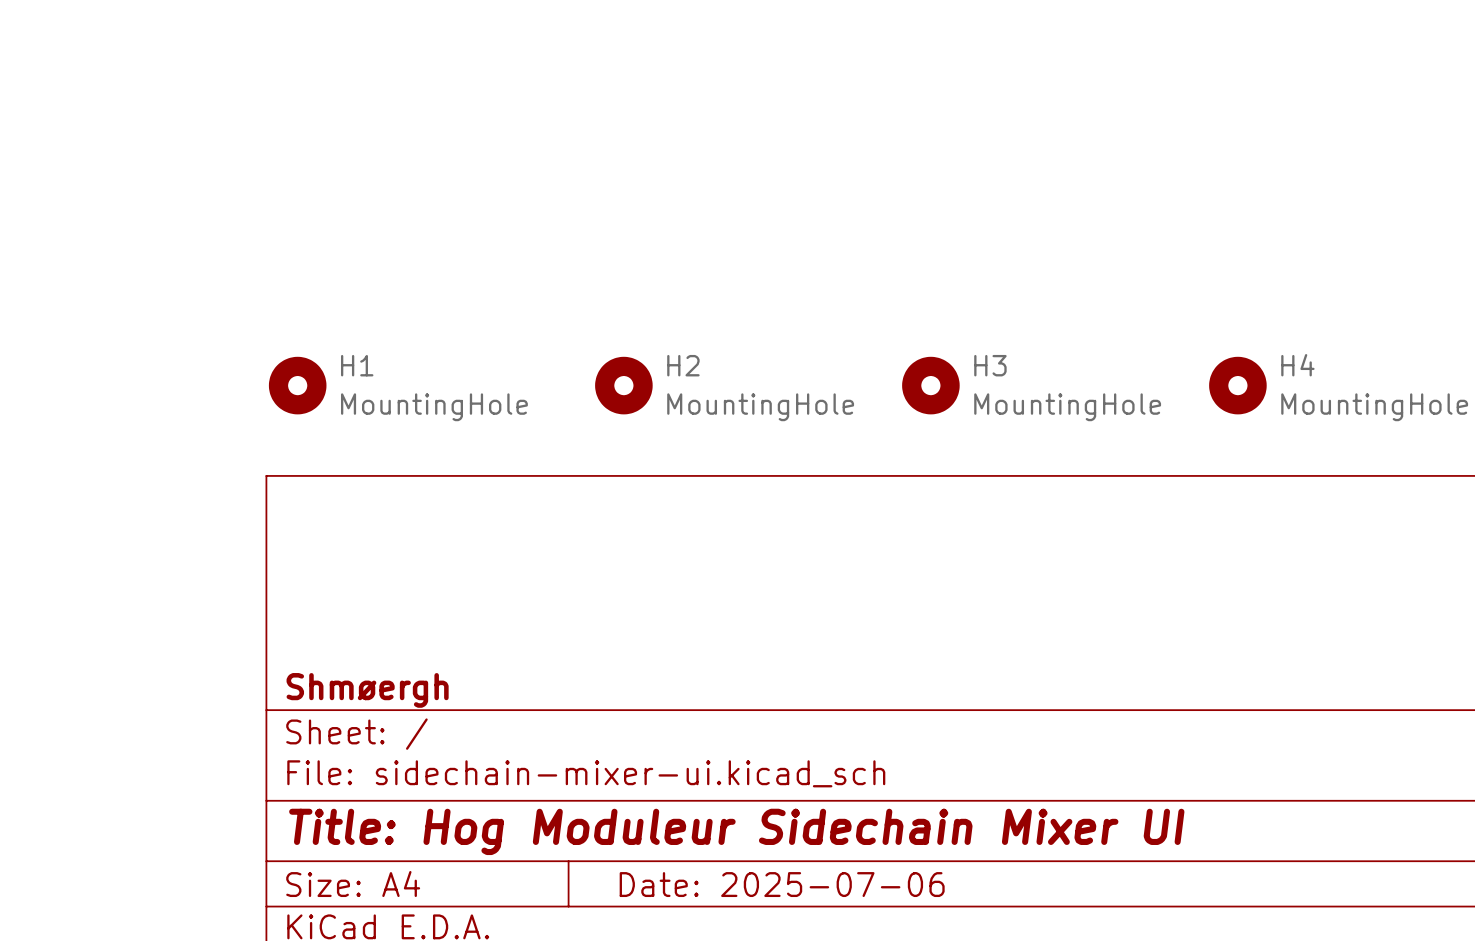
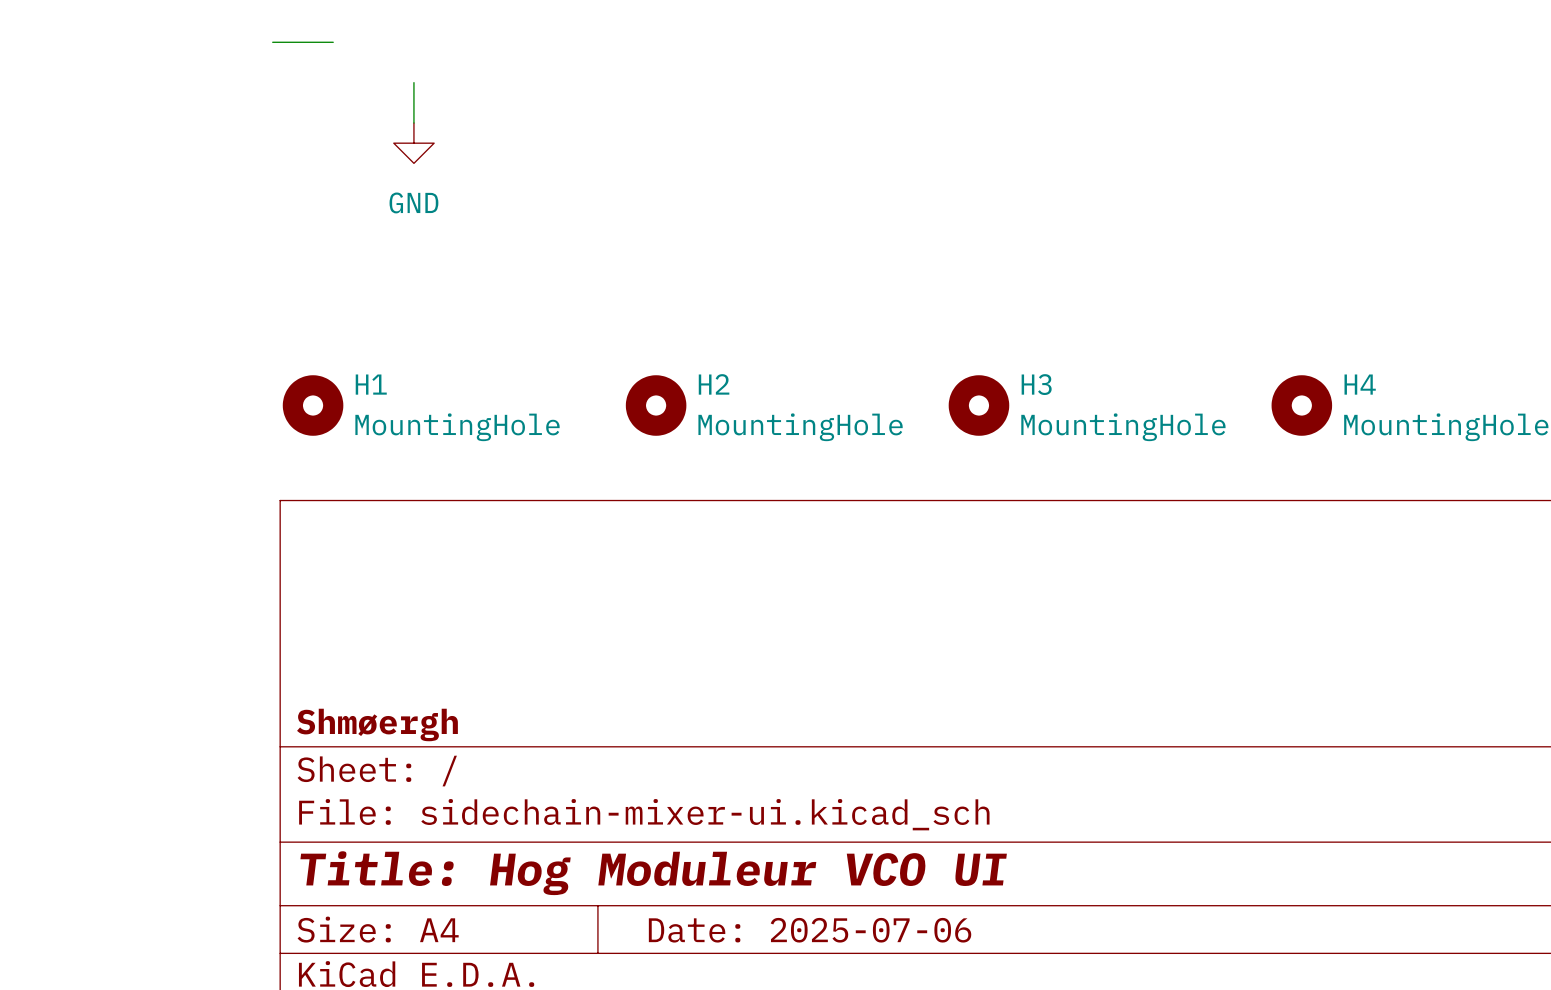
wire: none -> (272, 42) (333, 42)
wire: none -> (413, 82) (413, 123)
power symbol: none -> GND (413, 143)
title block: Title: Hog Moduleur Sidechain Mixer UI (736, 831) -> Title: Hog Moduleur VCO UI (653, 873)

